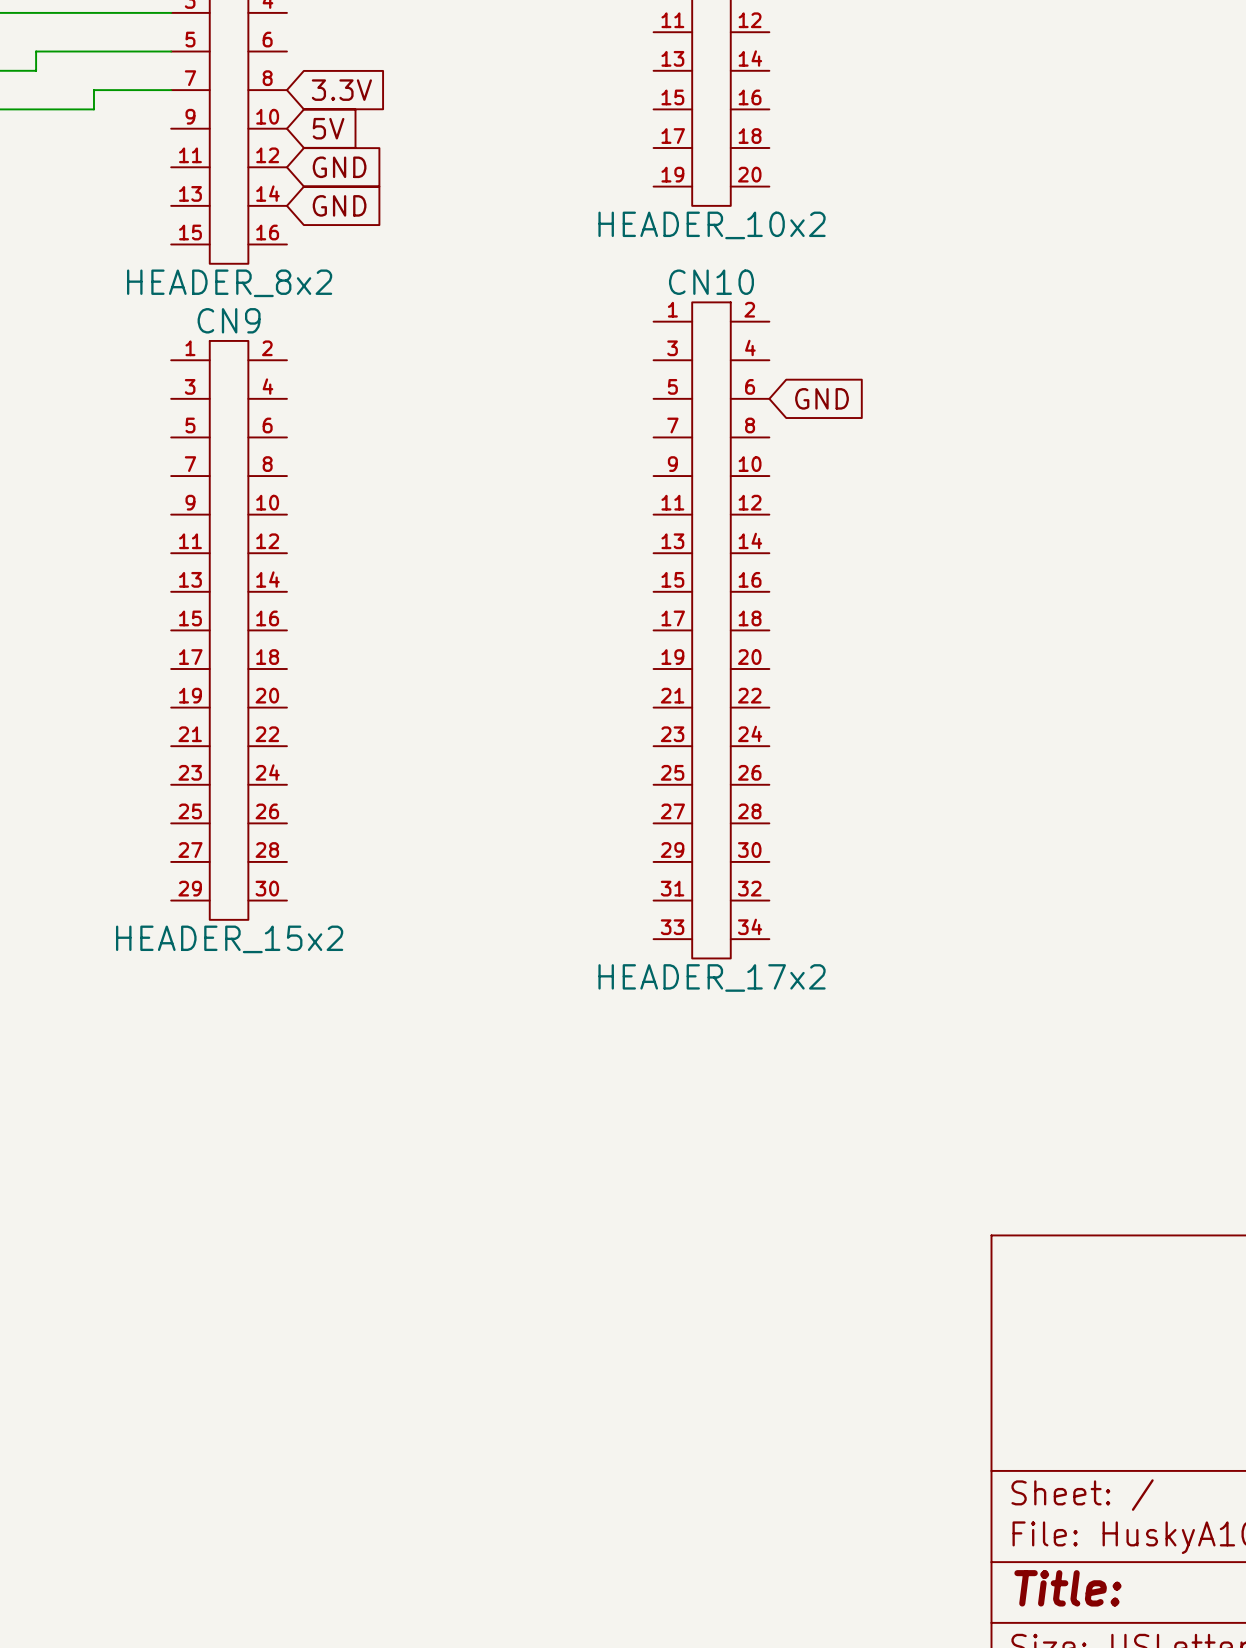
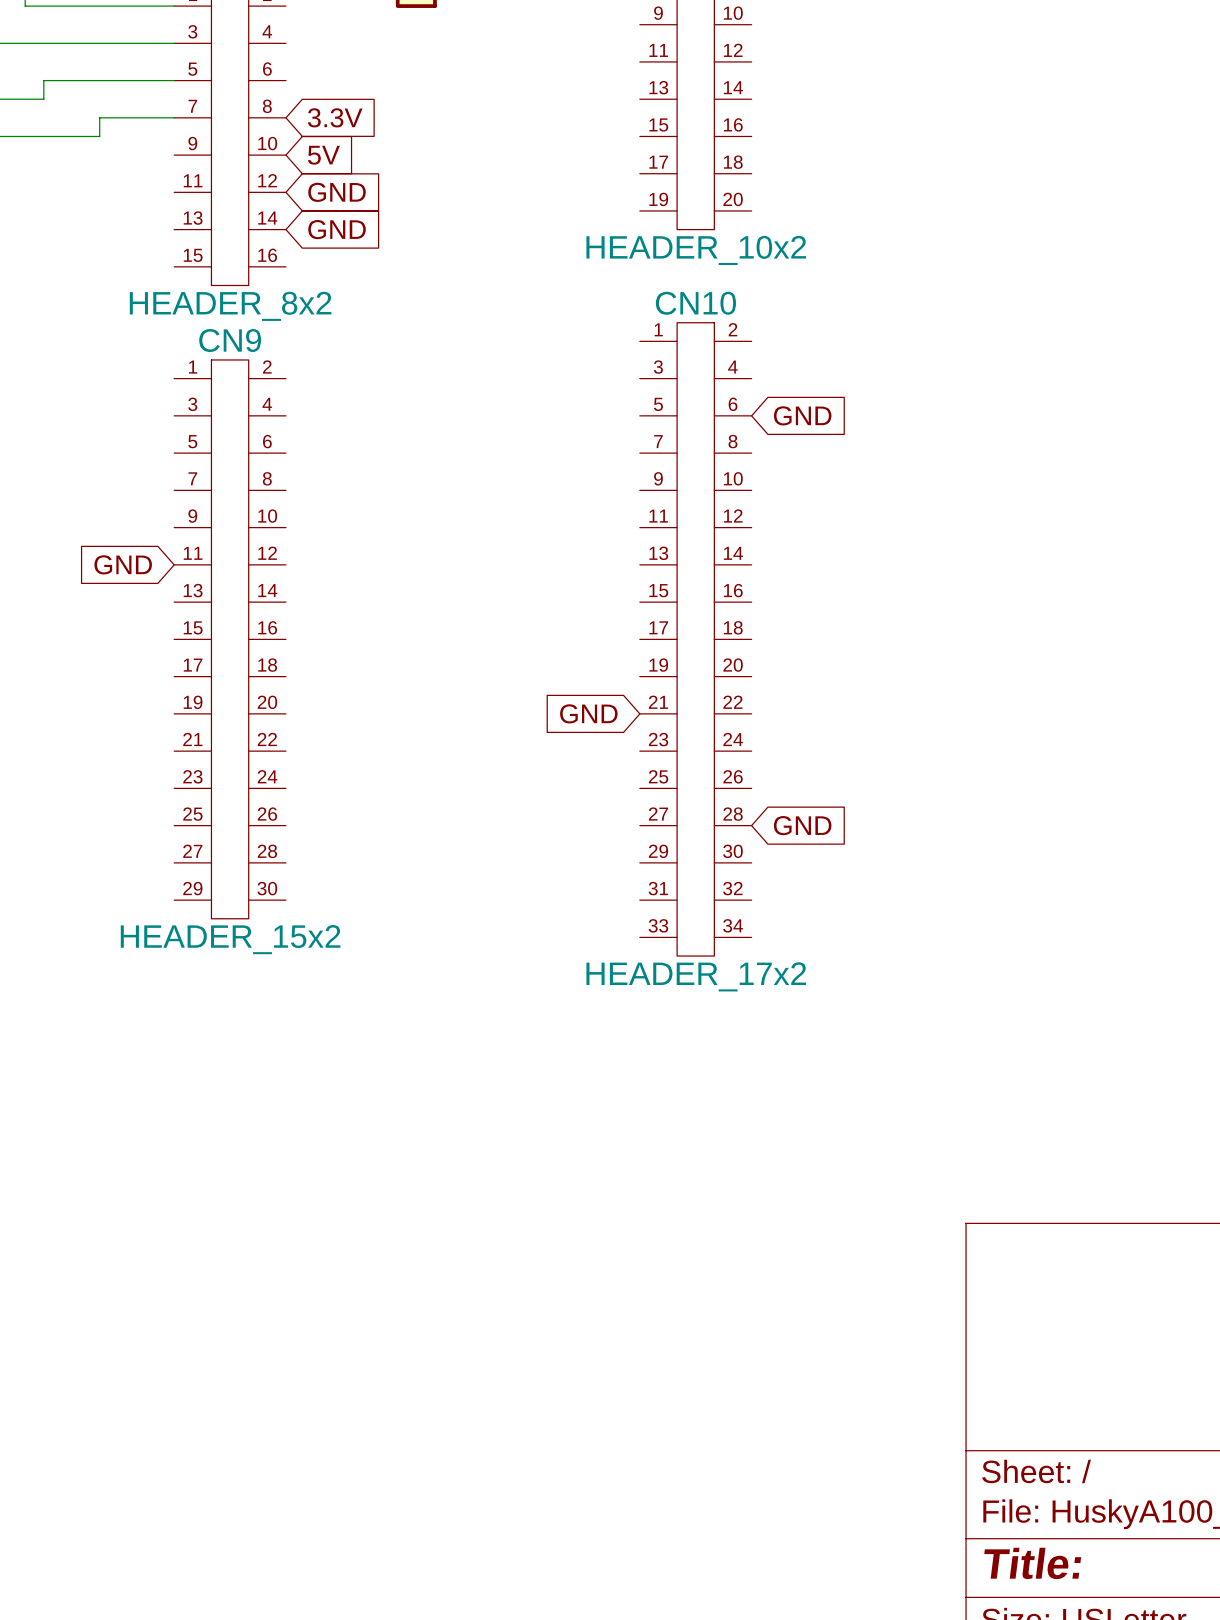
global label: none -> GND (123, 564)
global label: none -> GND (588, 713)
global label: none -> GND (802, 825)

